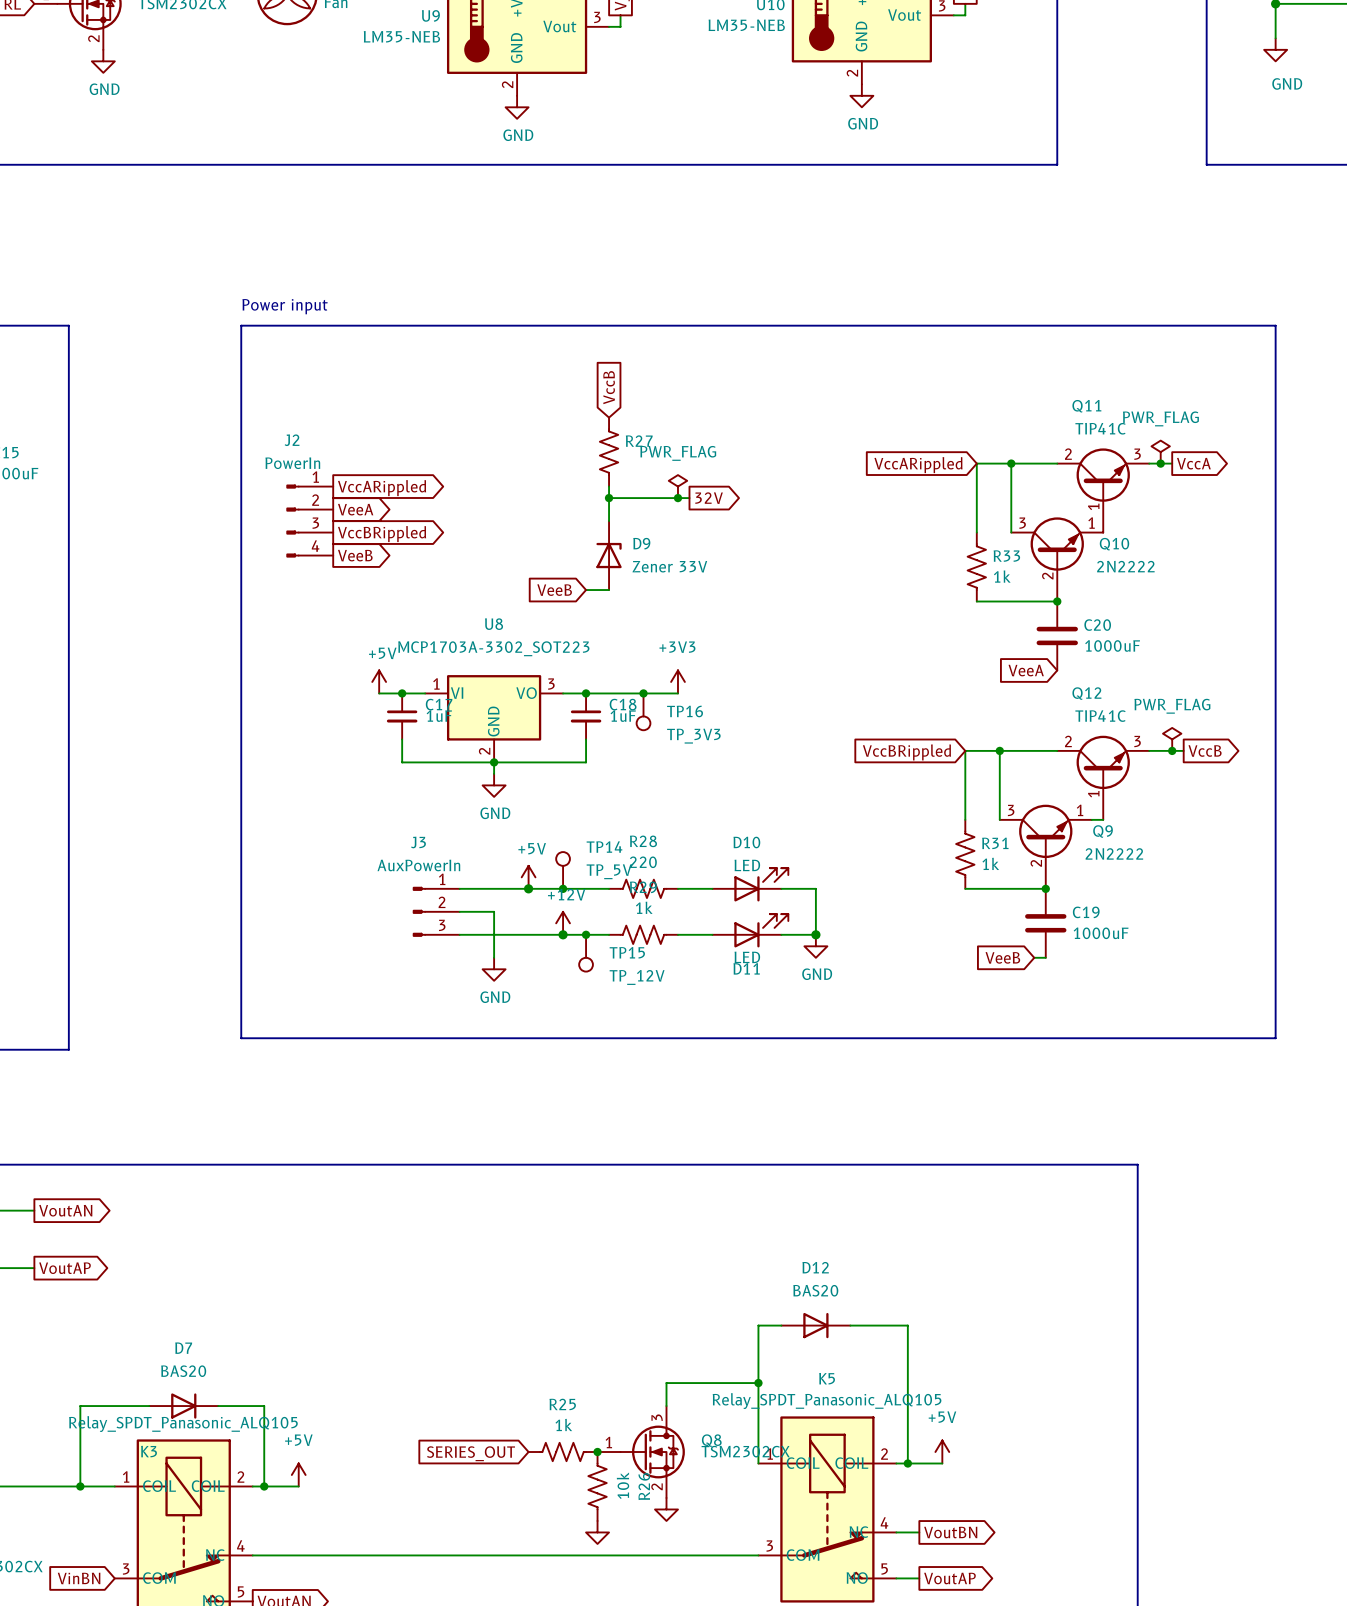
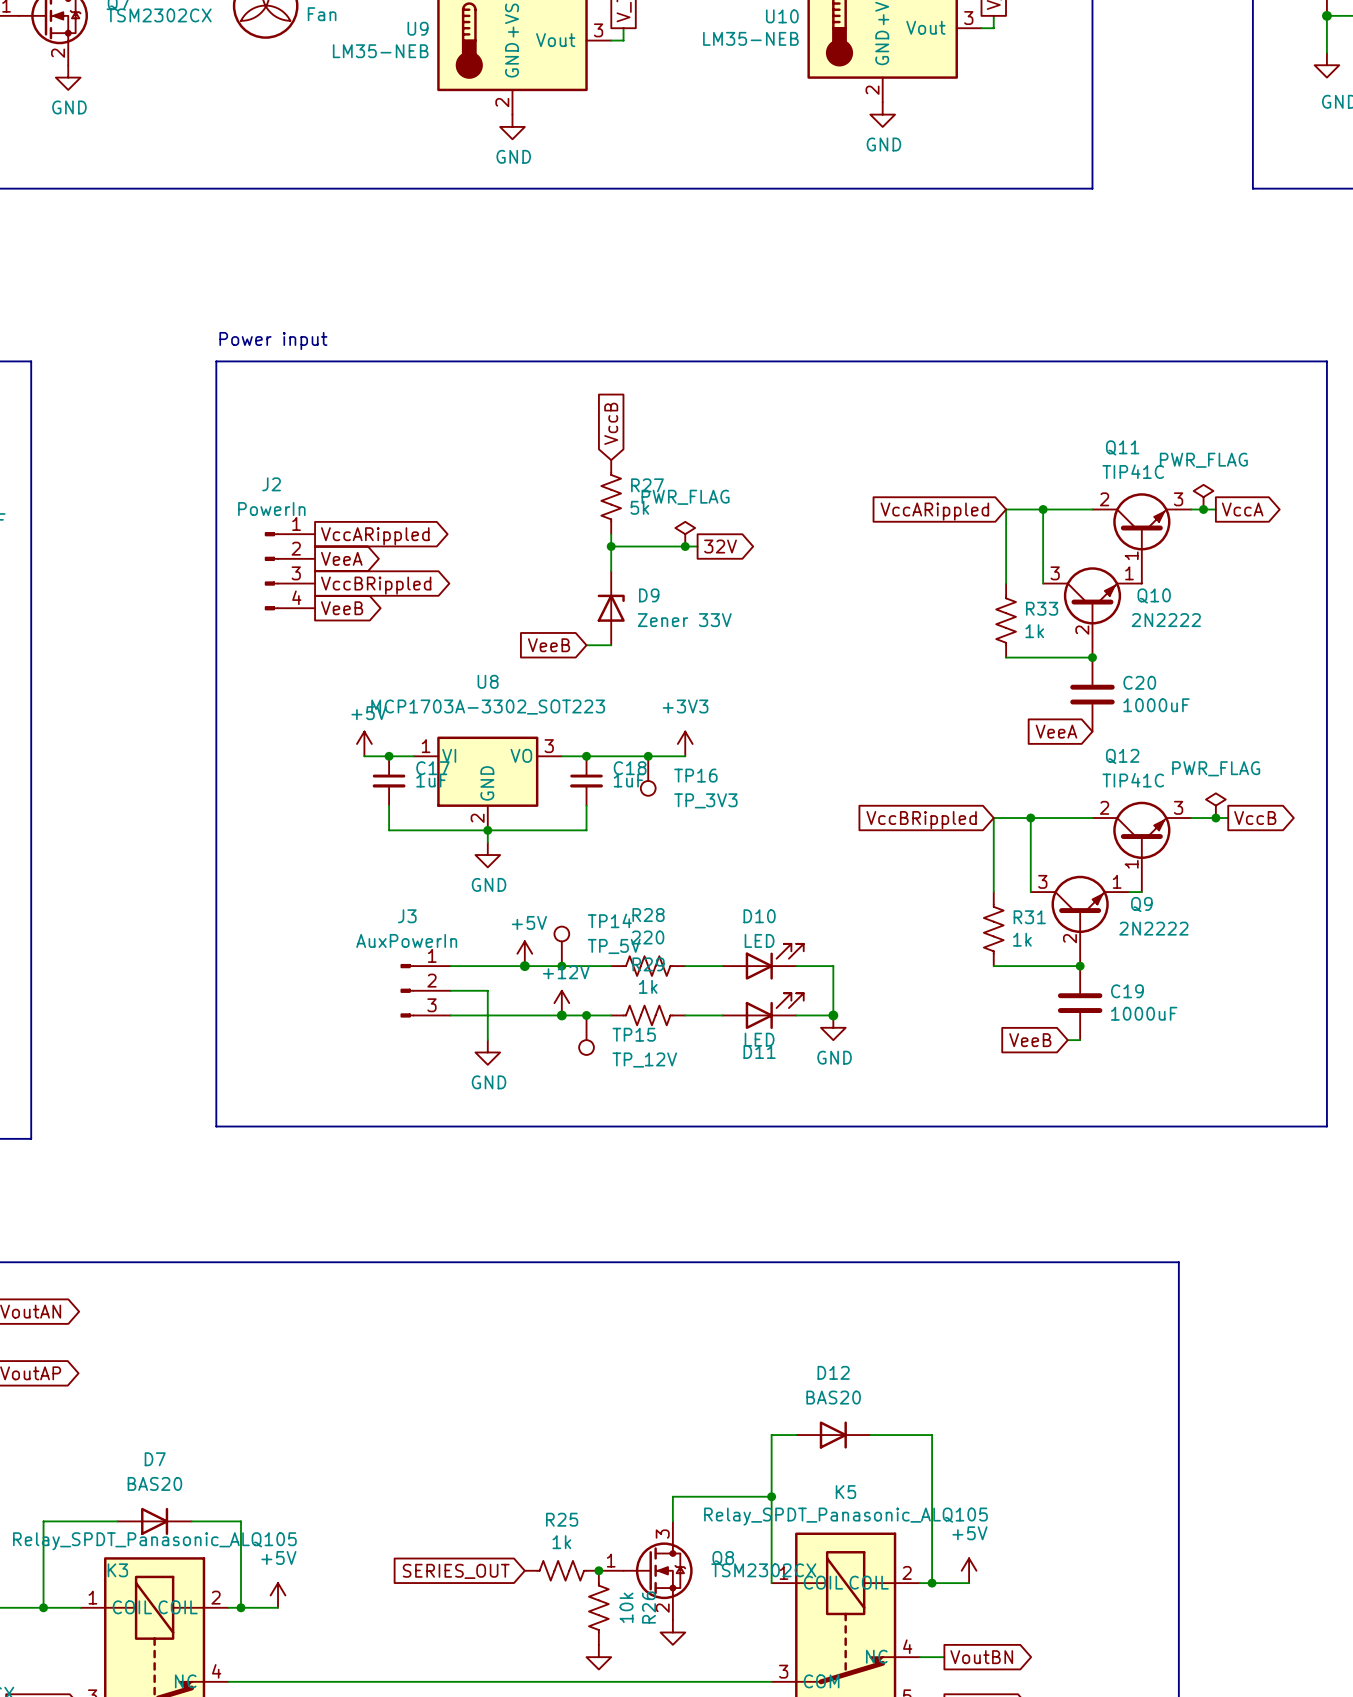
R27 value: none -> 5k (639, 507)

